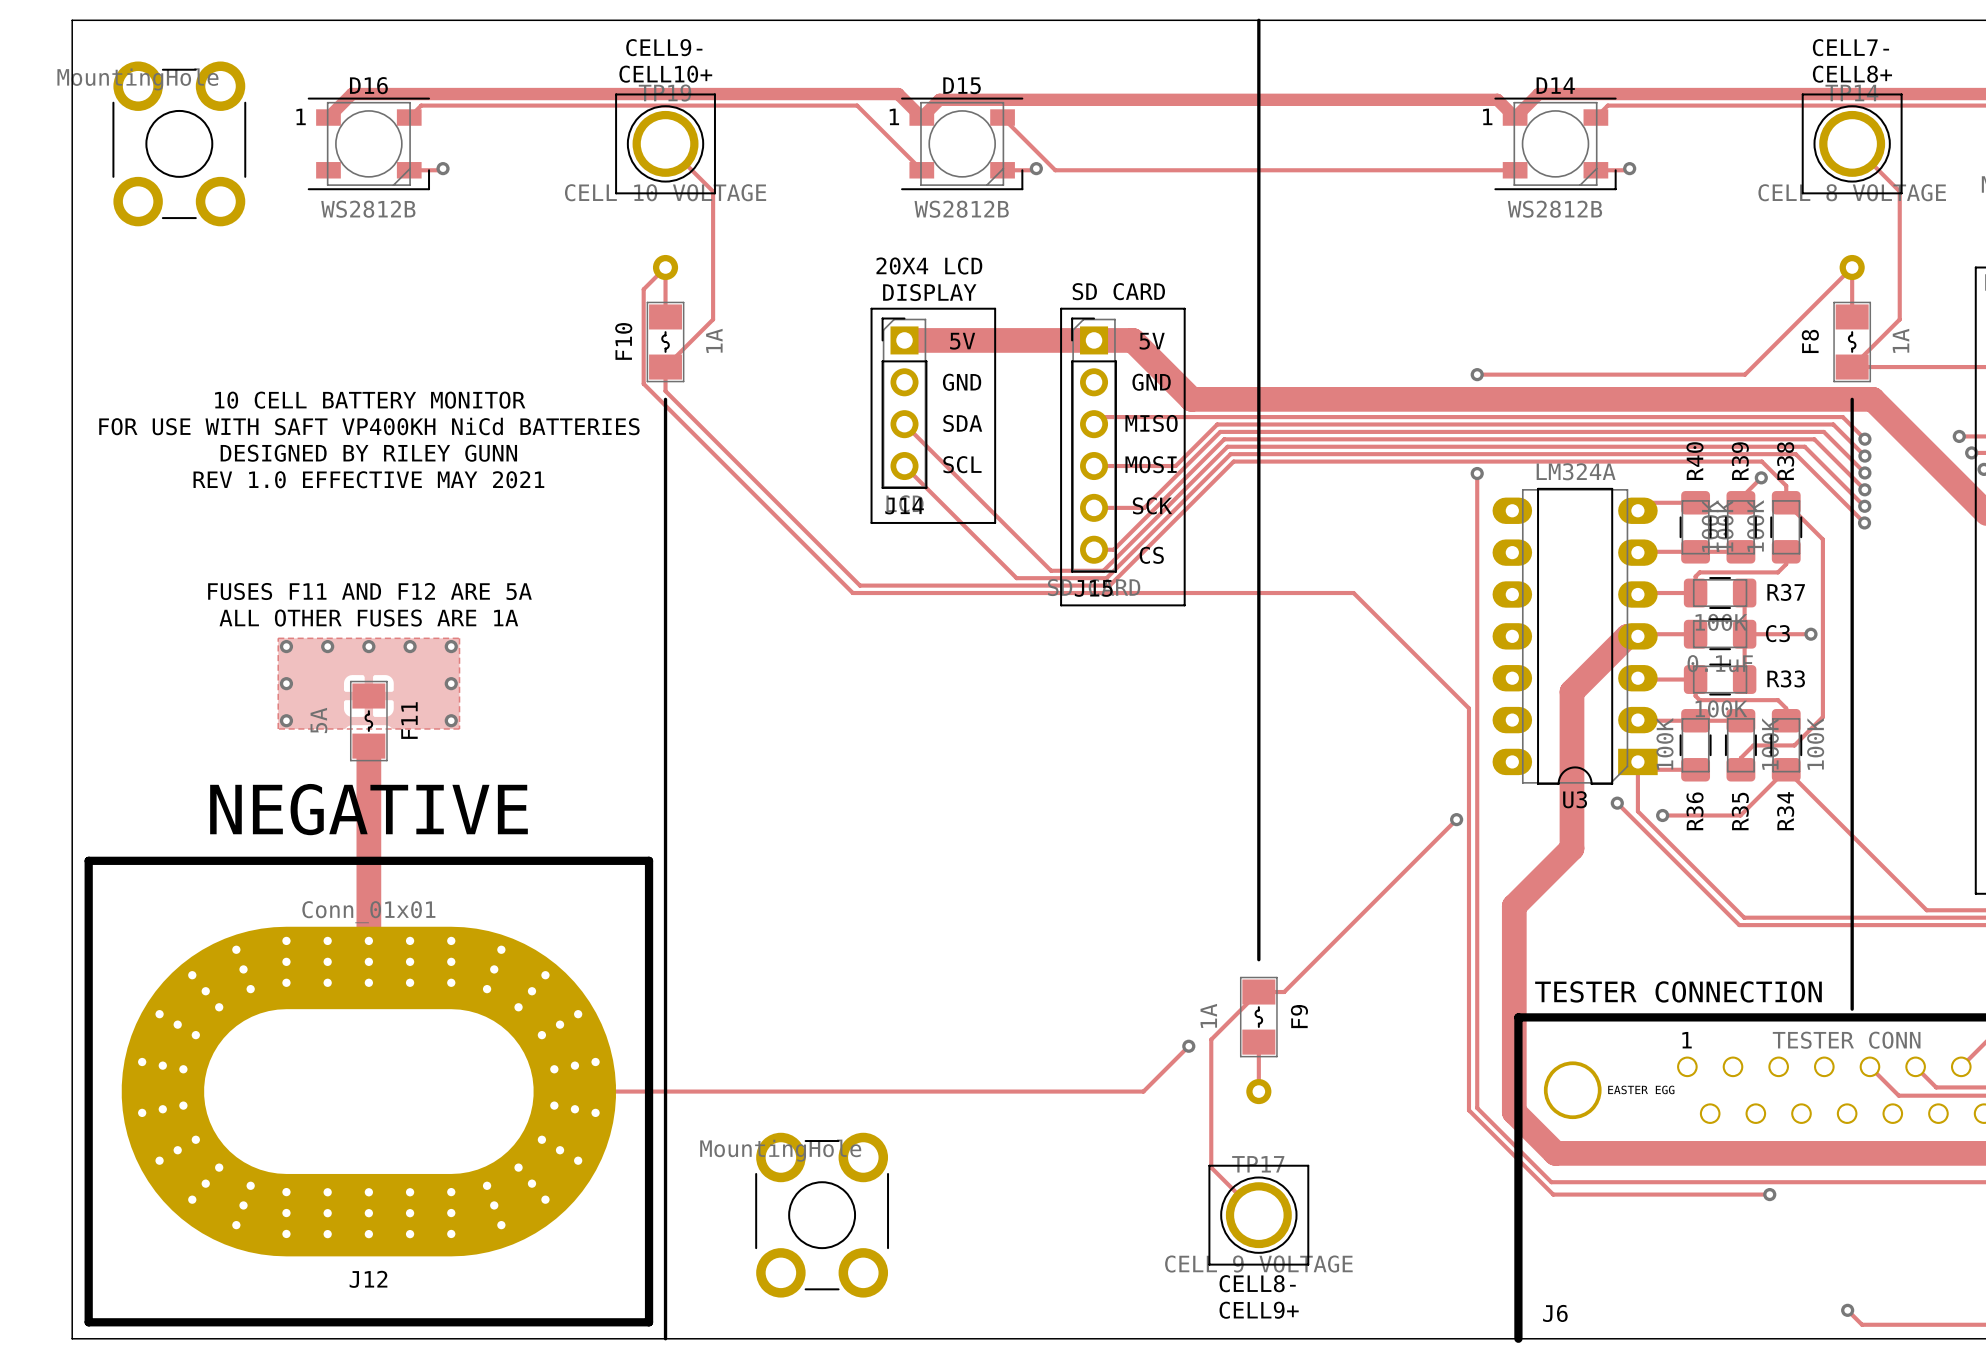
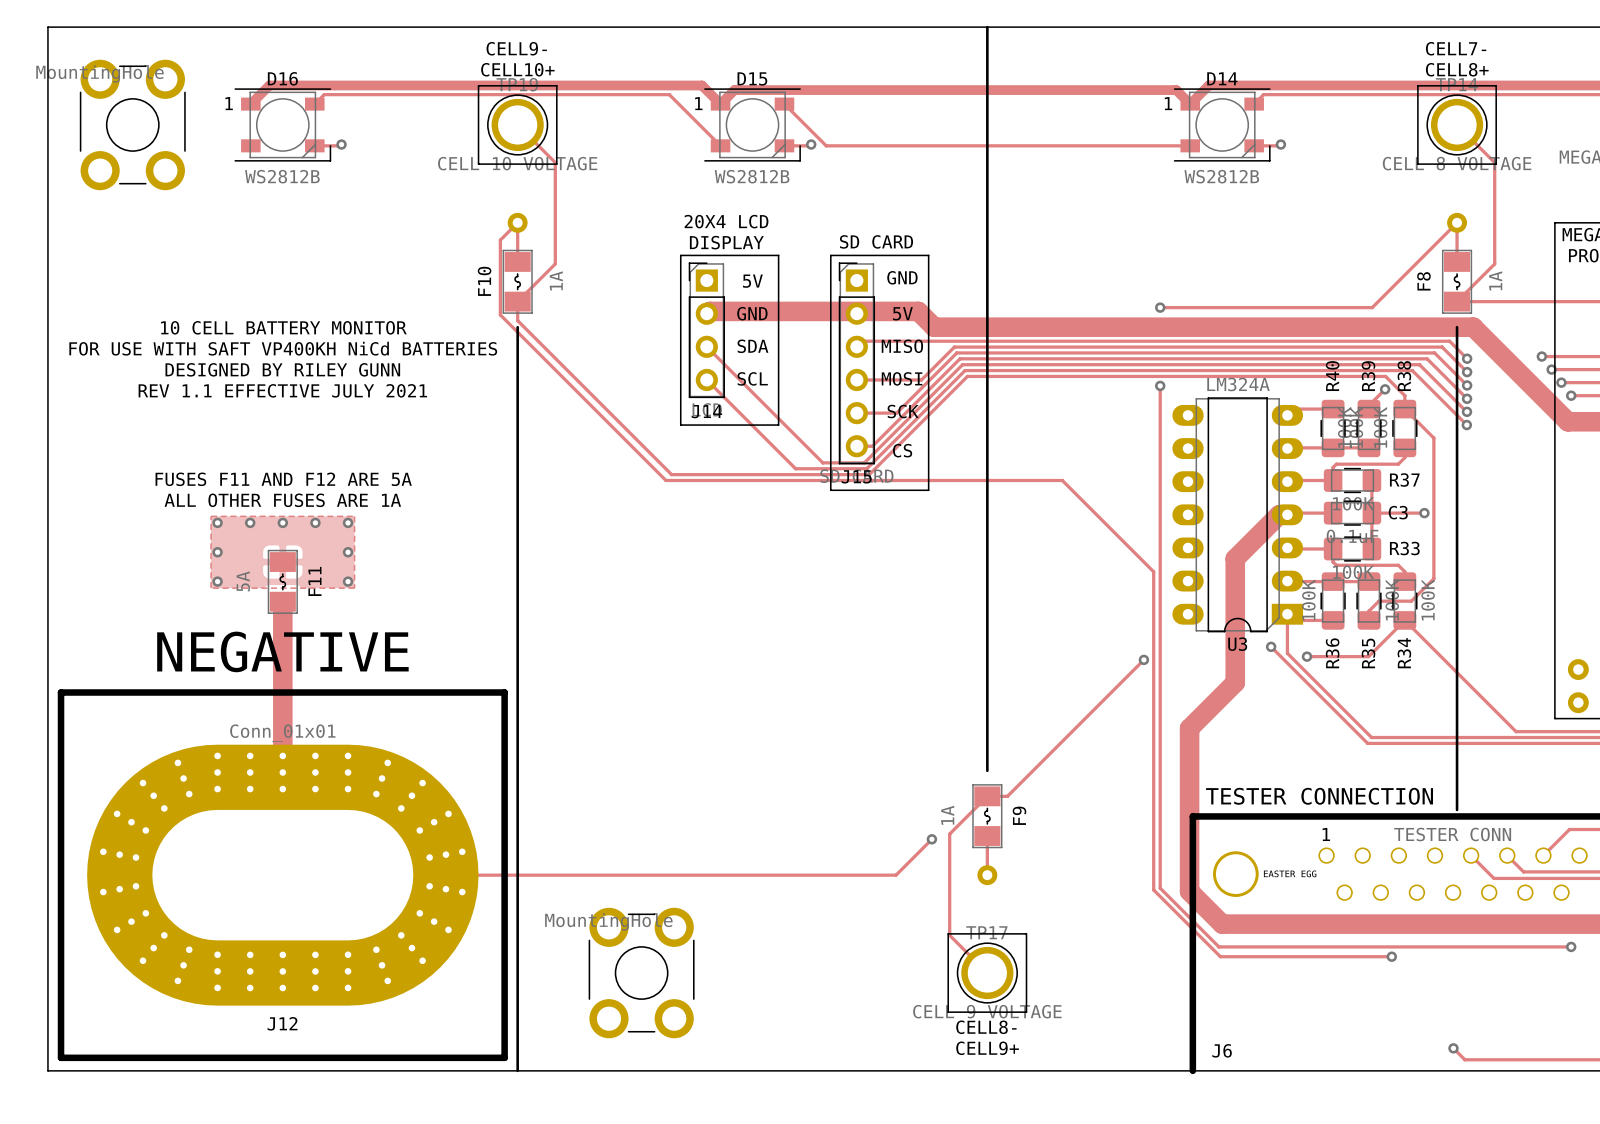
track: (904, 340) (1132, 340) (1171, 379) -> (706, 314) (710, 311) (918, 311)
text: 5V (1152, 341) -> GND (902, 277)
text: GND (1151, 382) -> 5V (902, 313)
text: REV 1.0 EFFECTIVE MAY 2021 (368, 479) -> REV 1.1 EFFECTIVE JULY 2021 (282, 390)

